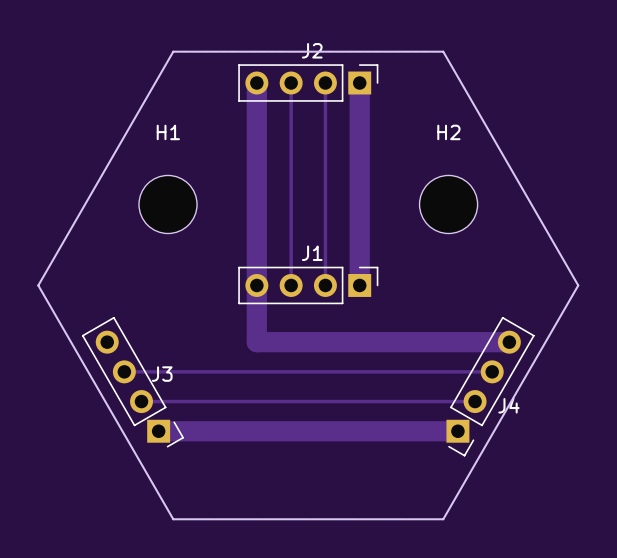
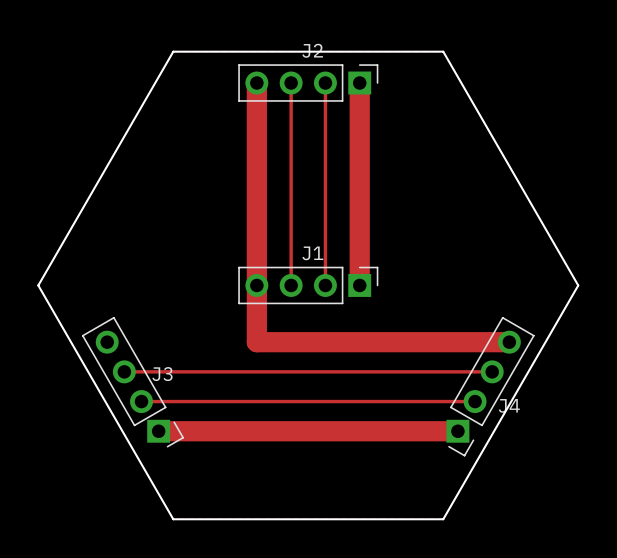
H1: (168, 204) -> none
H2: (448, 204) -> none

